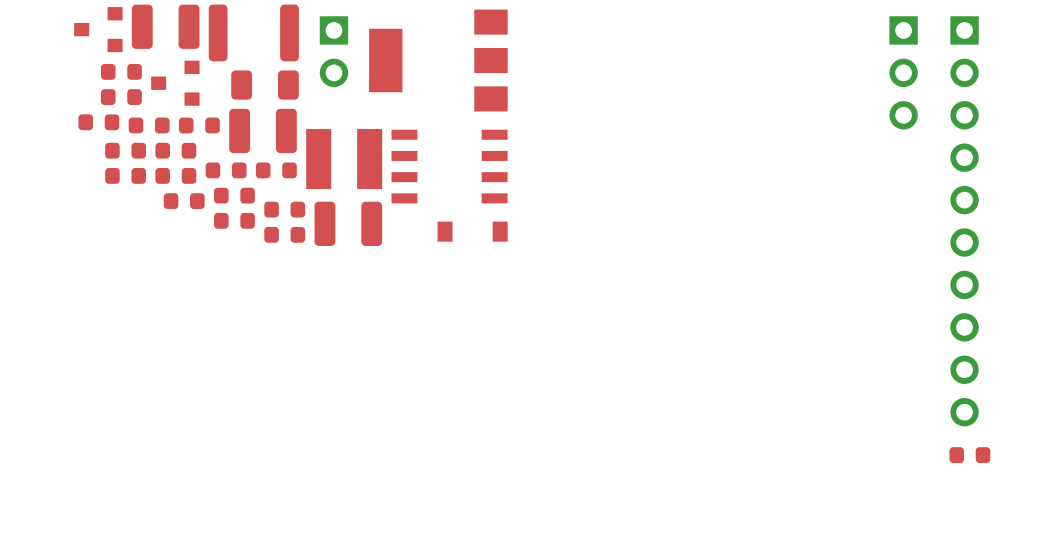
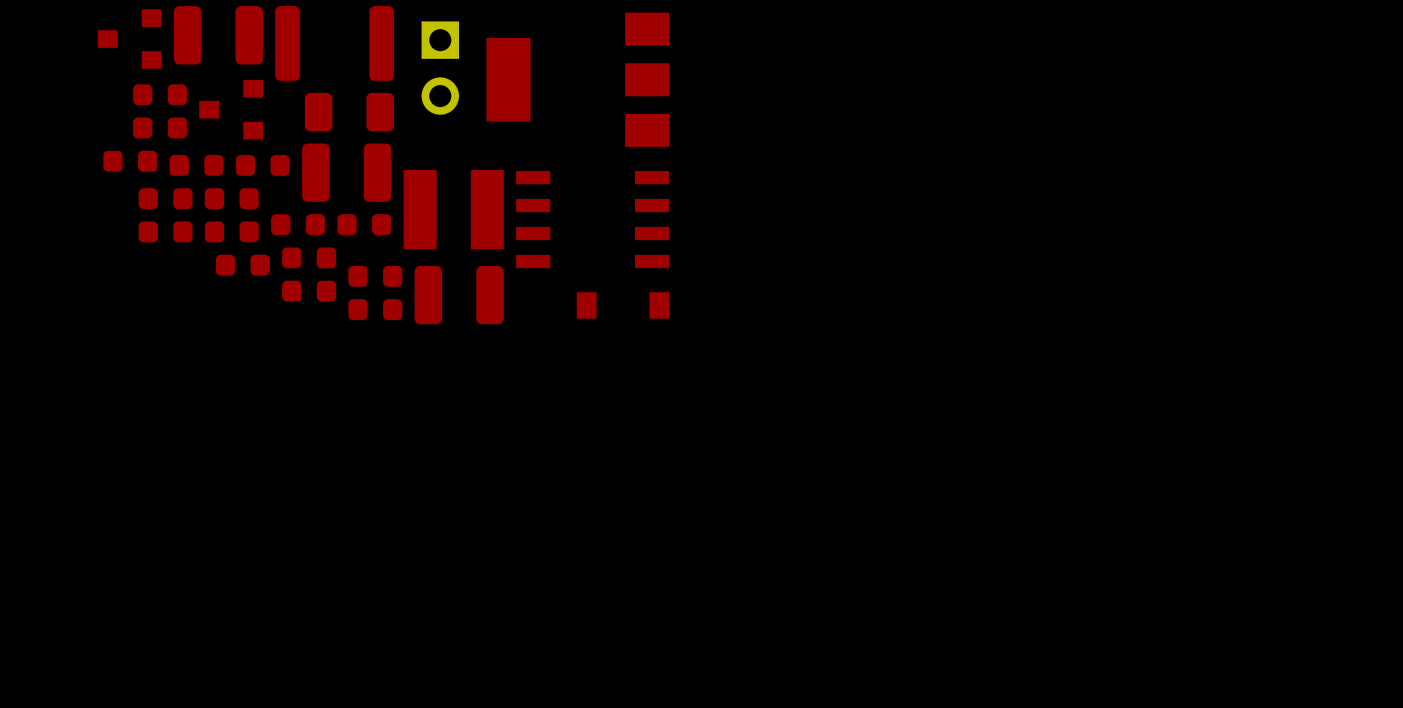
part: (903, 72) -> none
part: (964, 221) -> none
part: (969, 455) -> none

